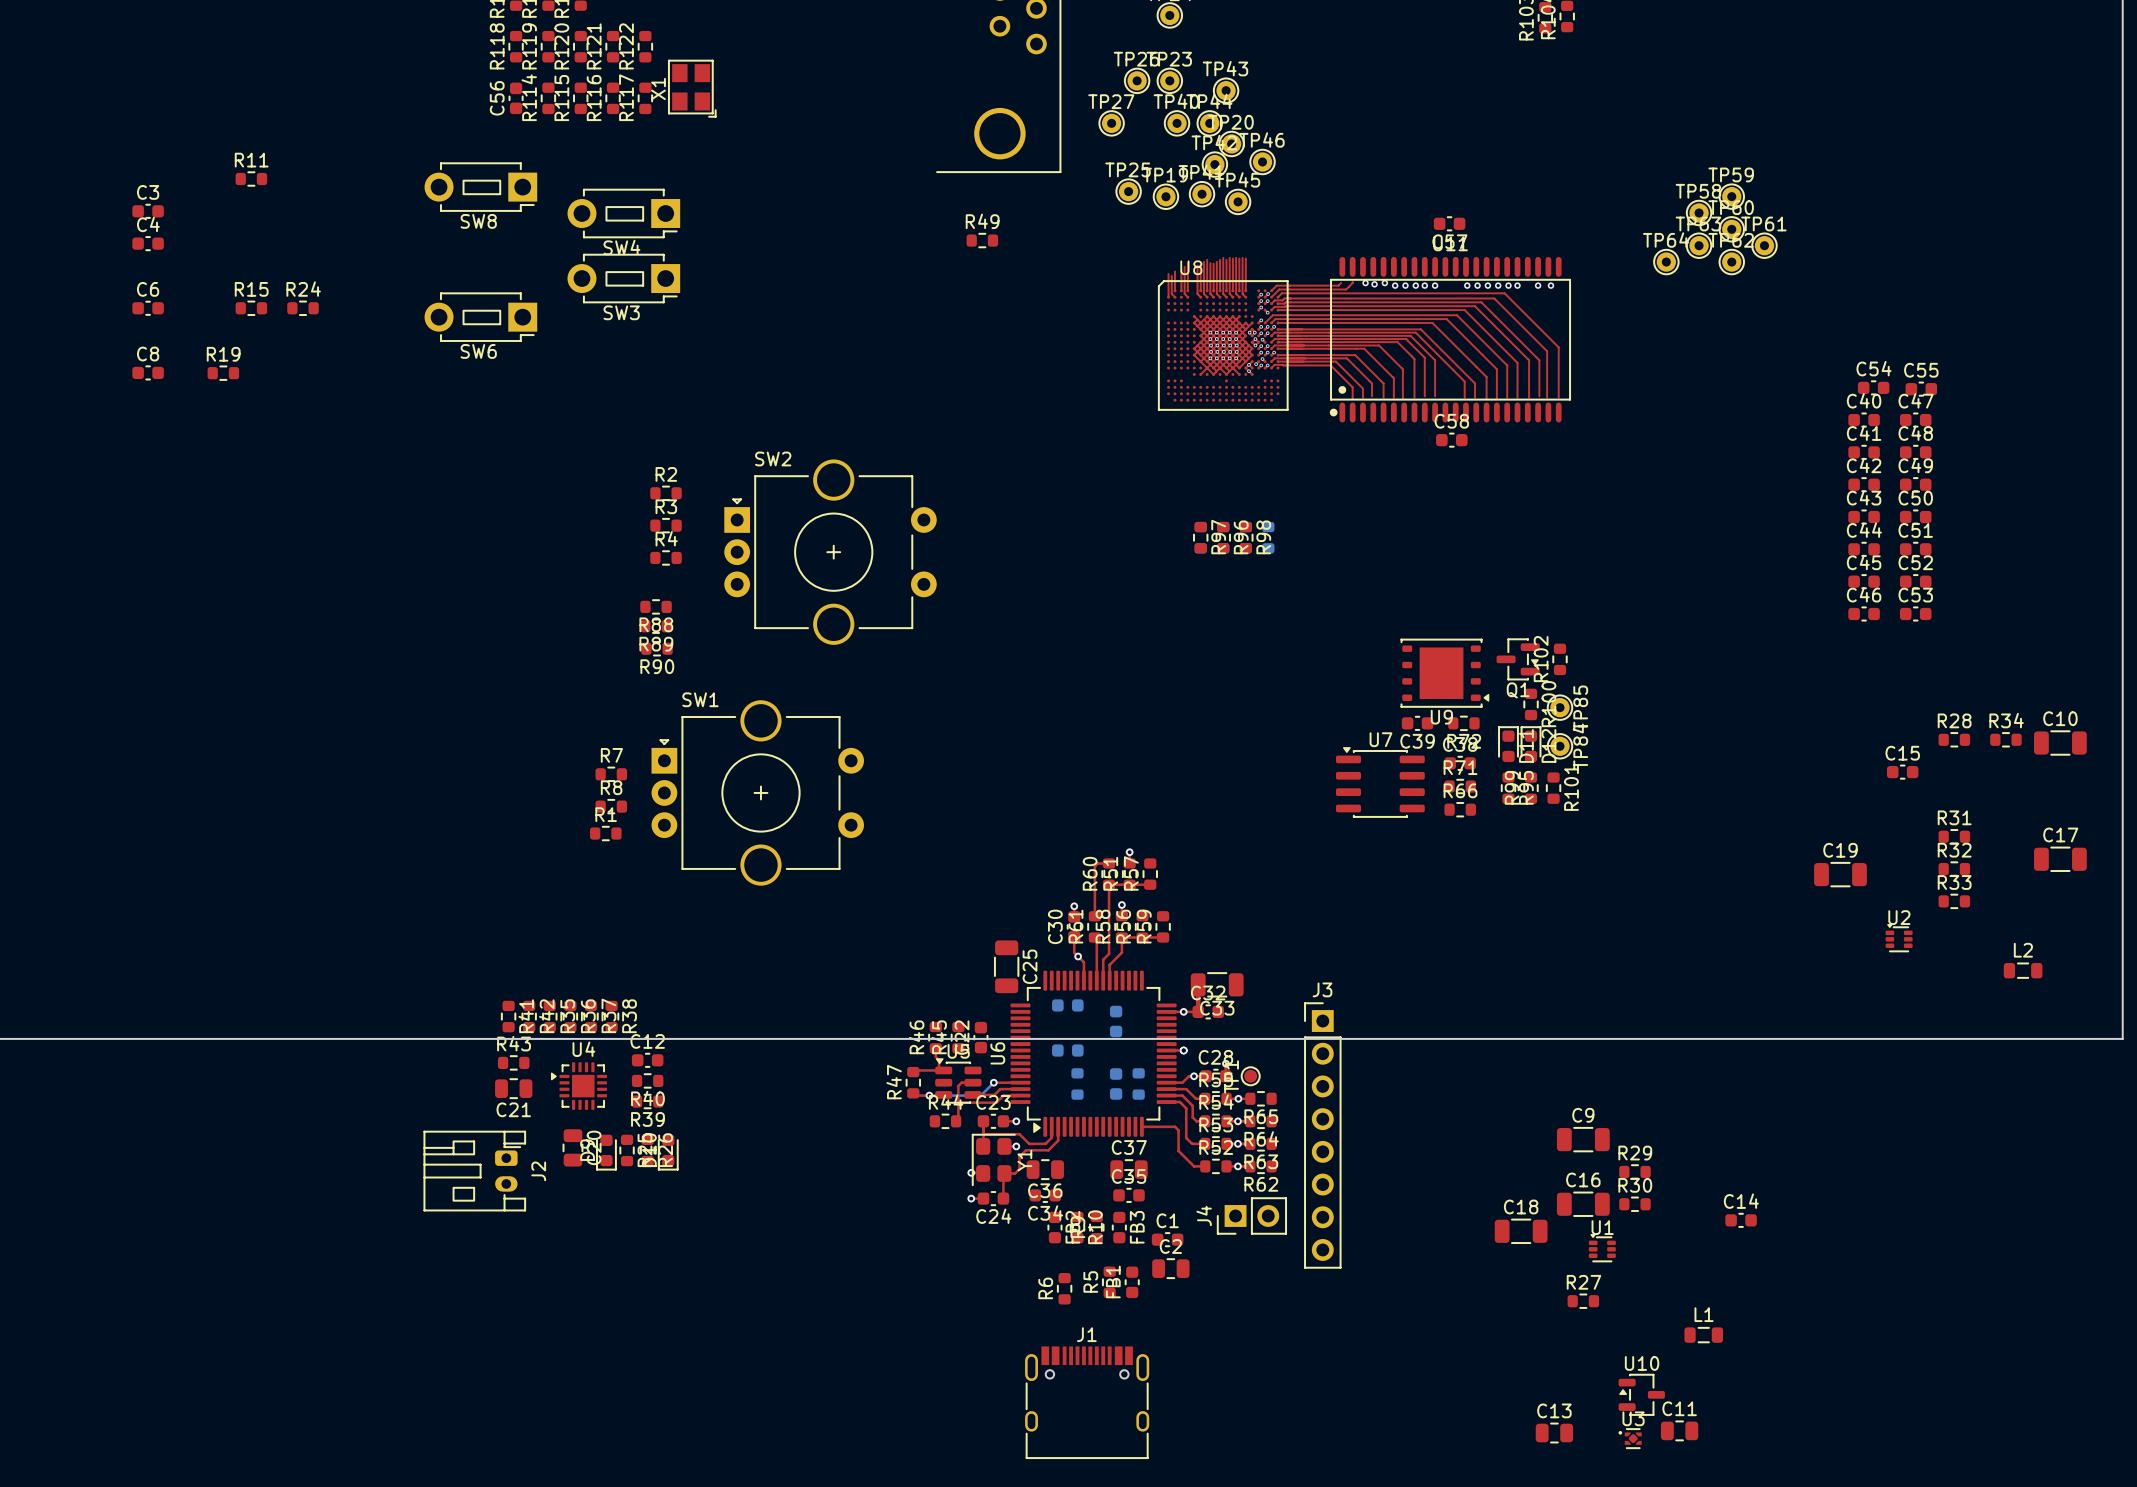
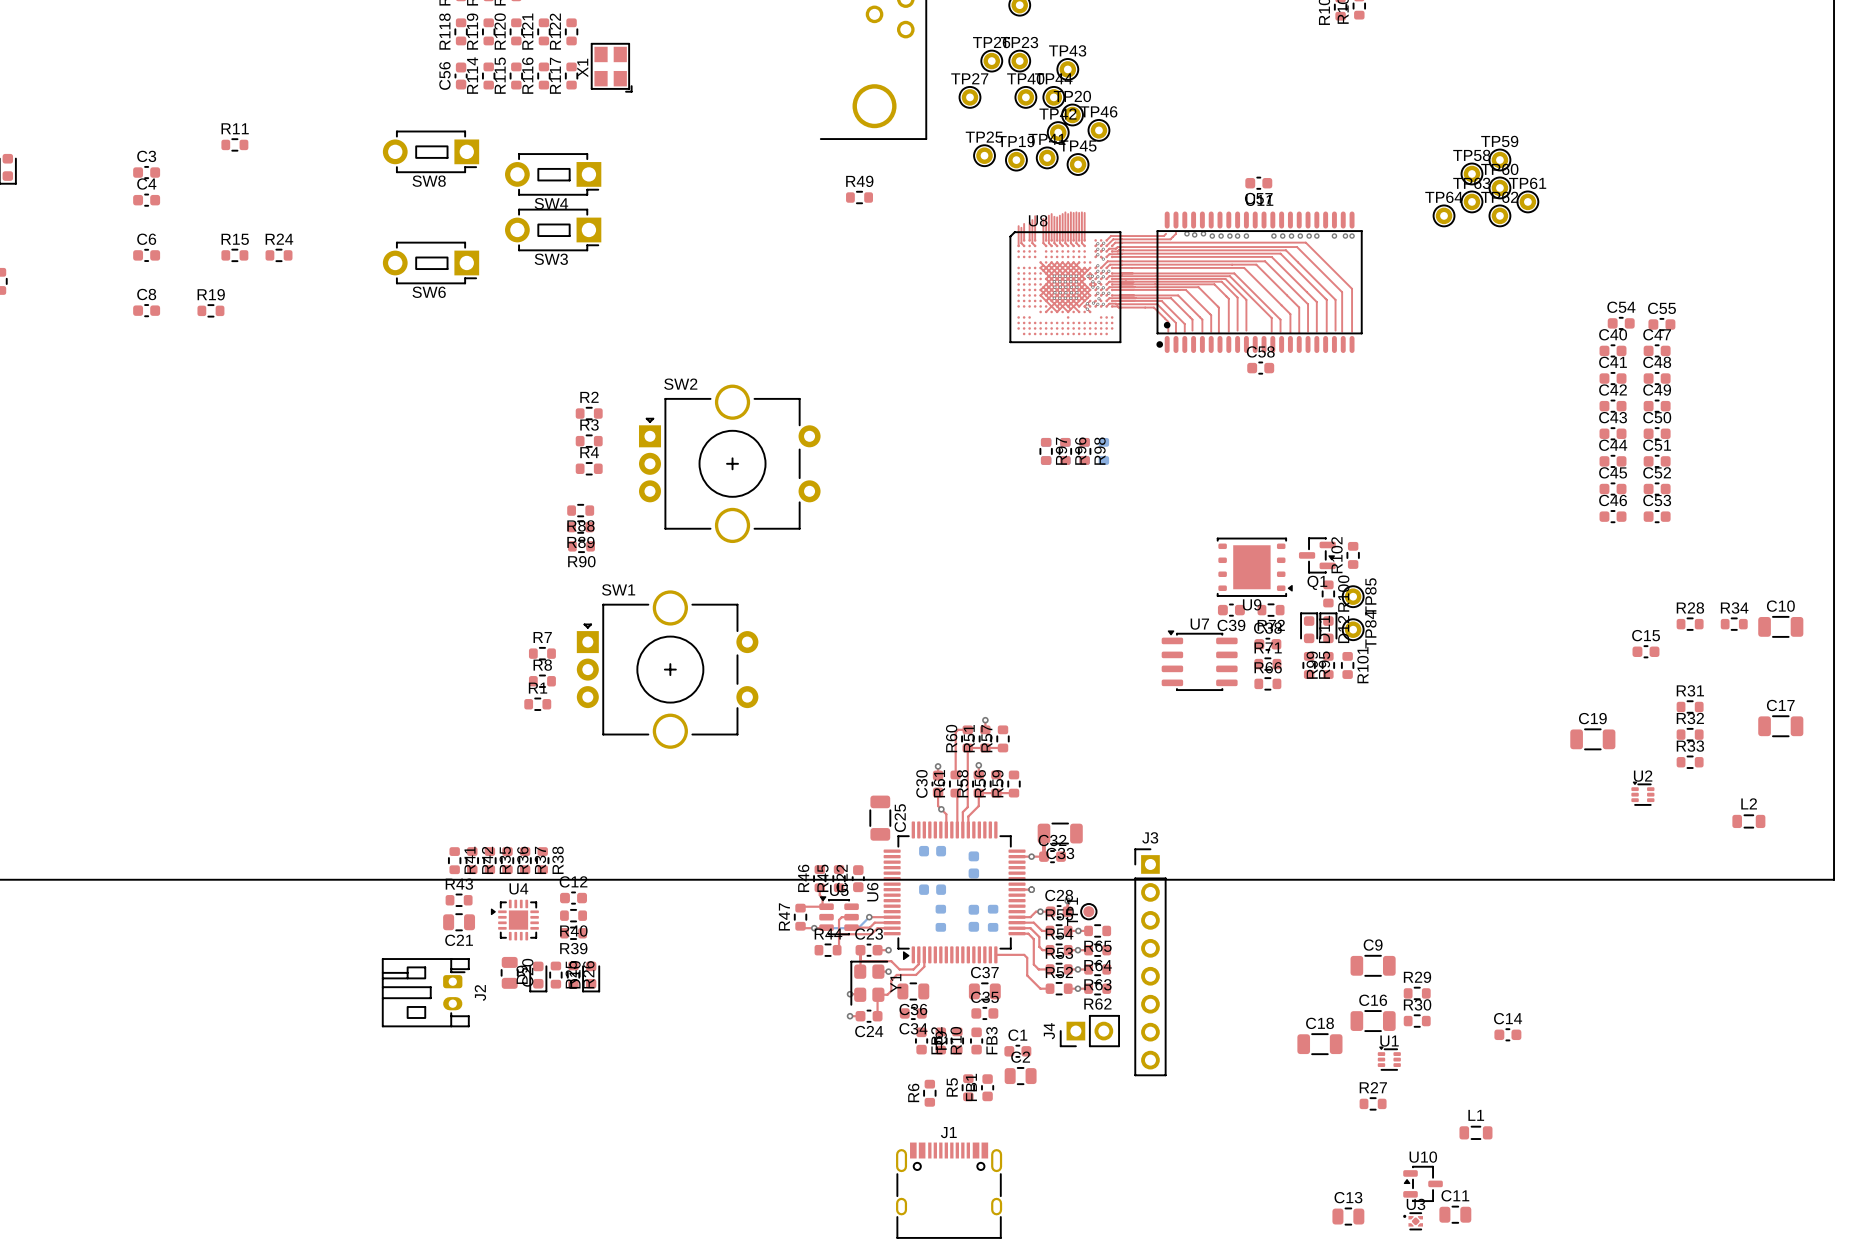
via: none -> (1352, 236)
top track: none -> (1112, 306) (1153, 307) (1168, 321) (1168, 331)

